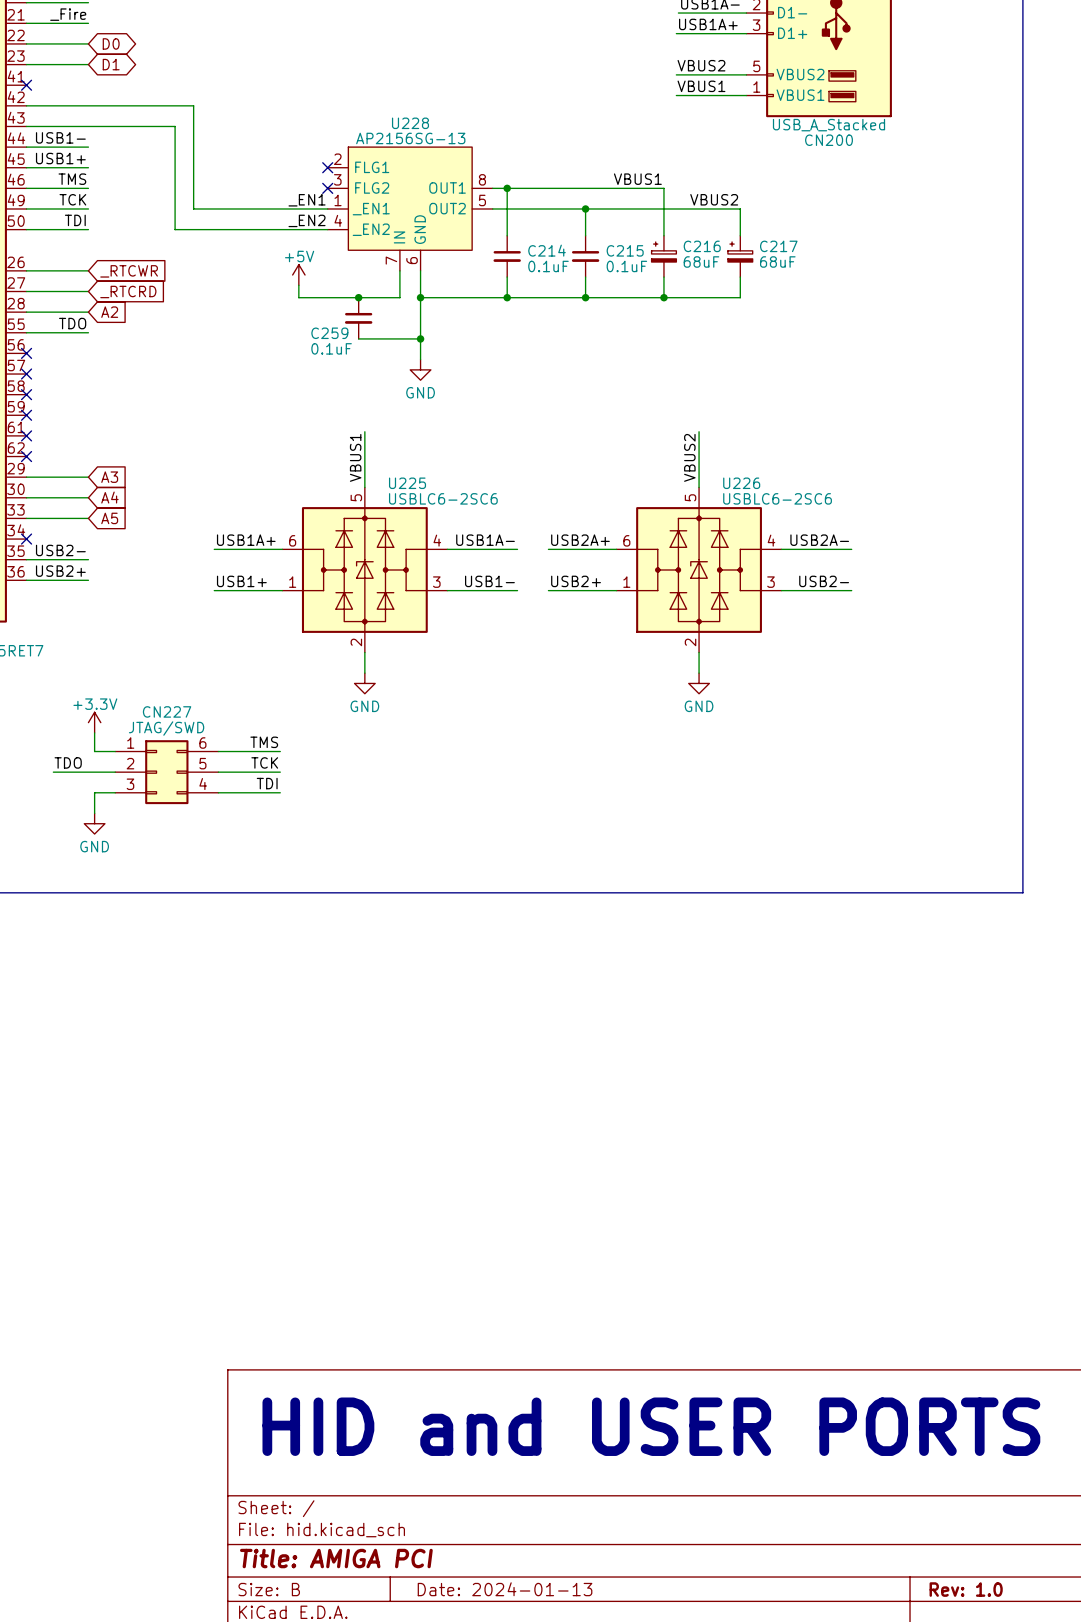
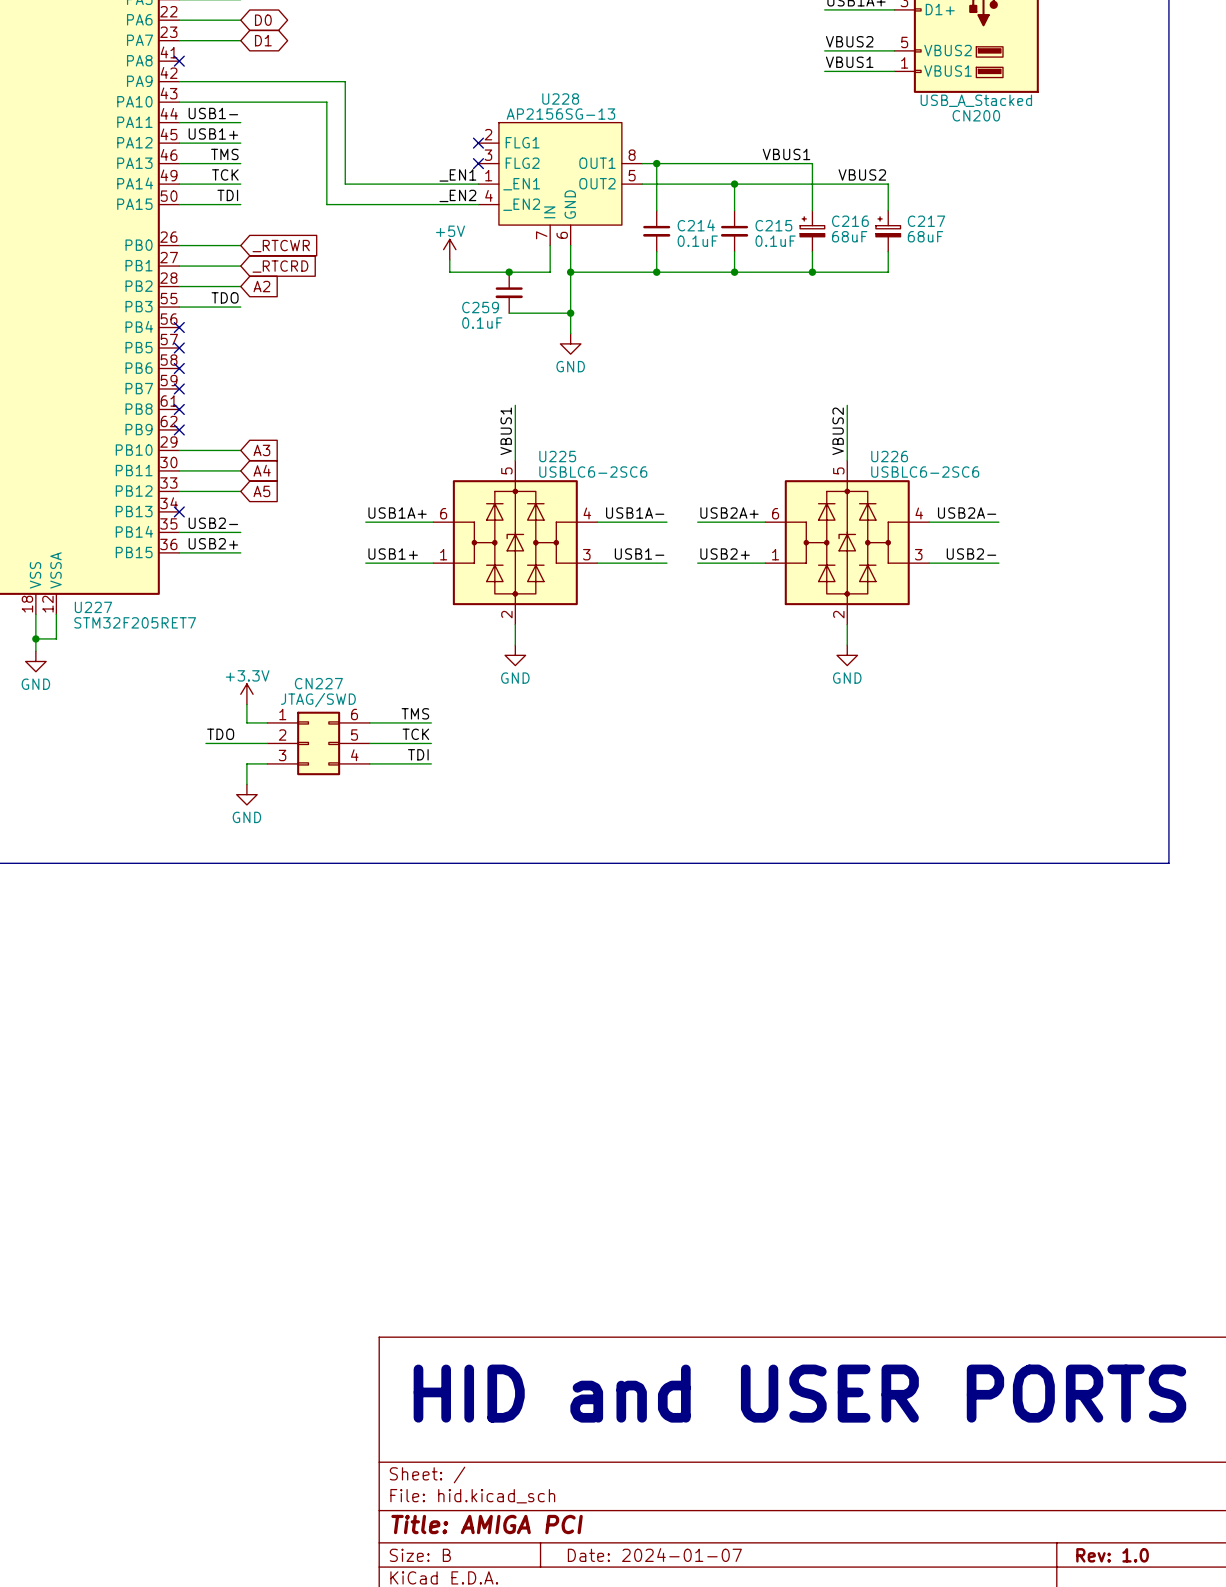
title block: Date: 2024-01-13 (505, 1589) -> Date: 2024-01-07 (654, 1555)

